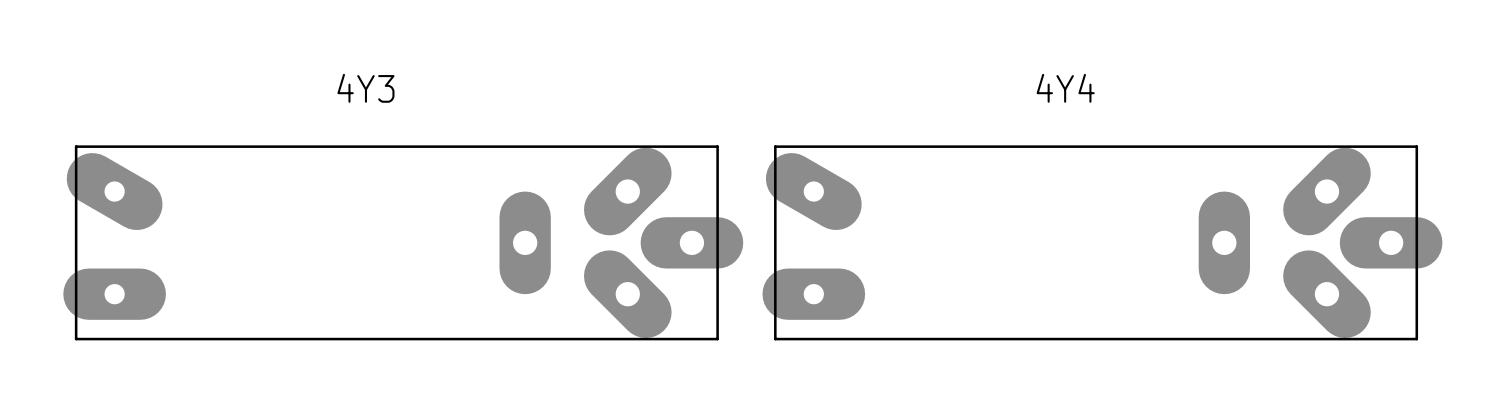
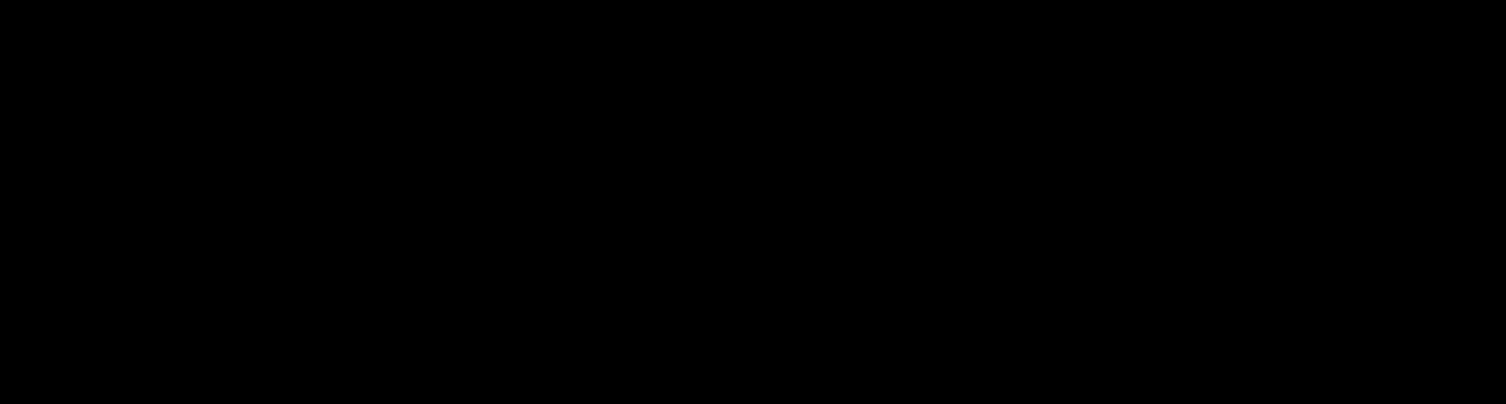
4Y3: (403, 242) -> none
4Y4: (1102, 242) -> none

